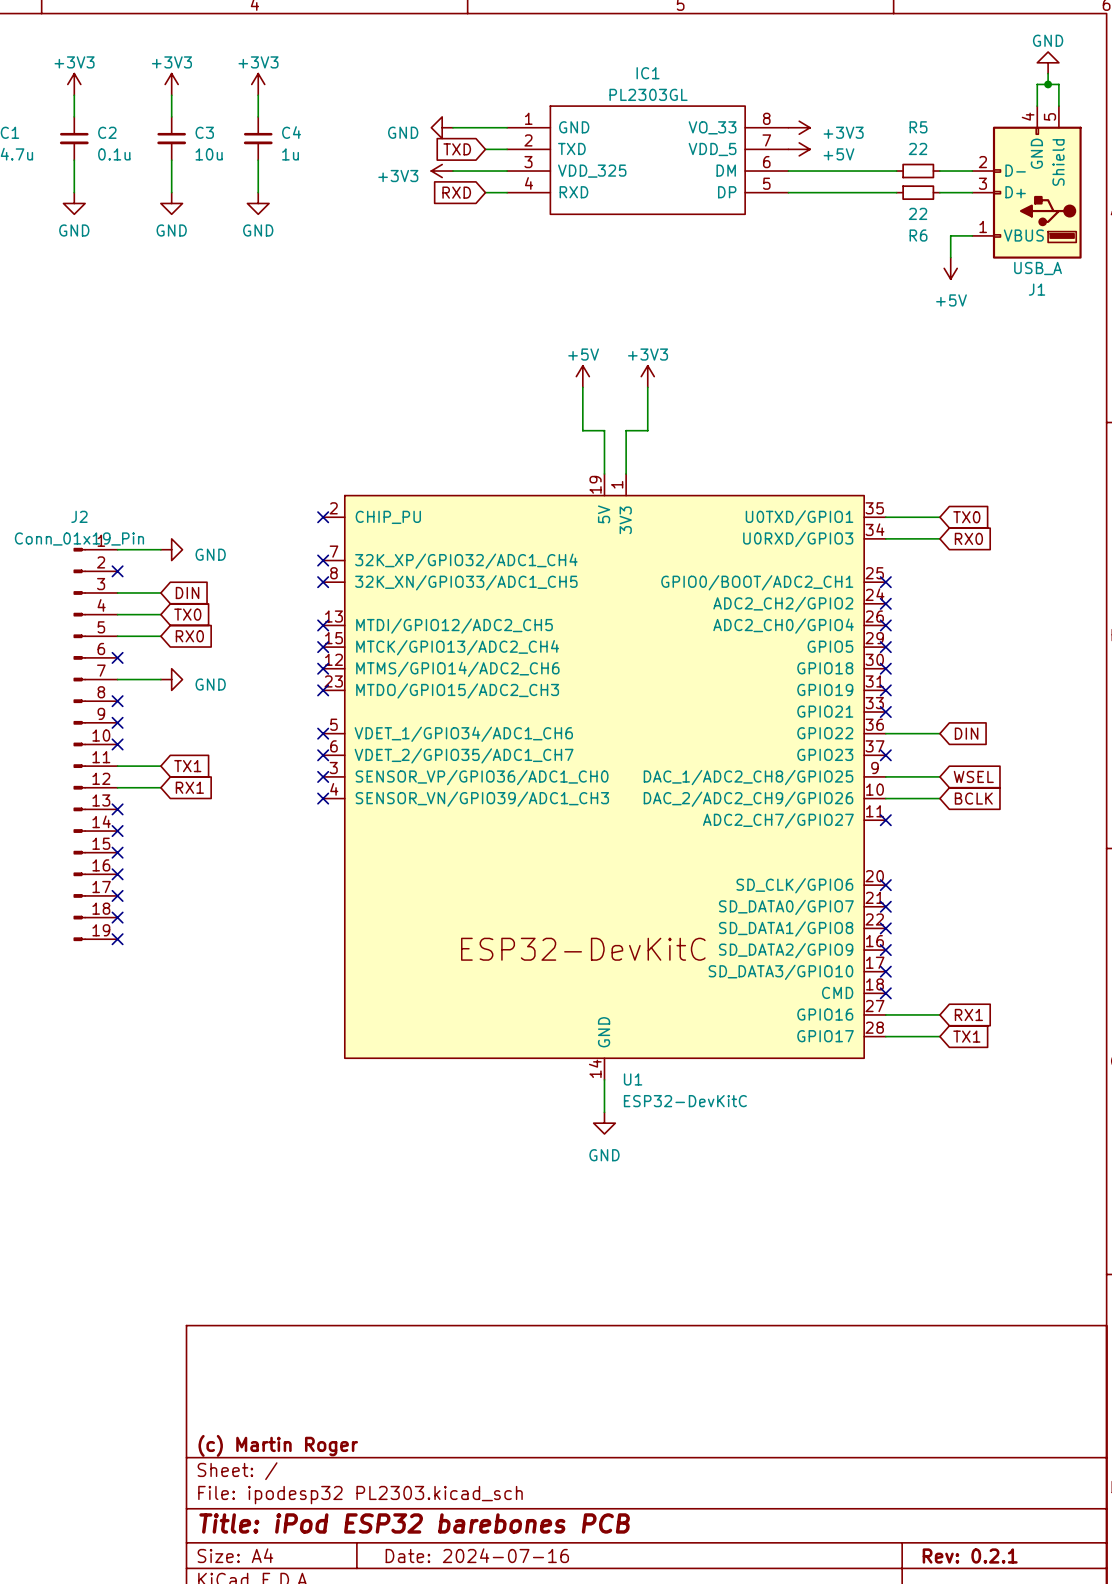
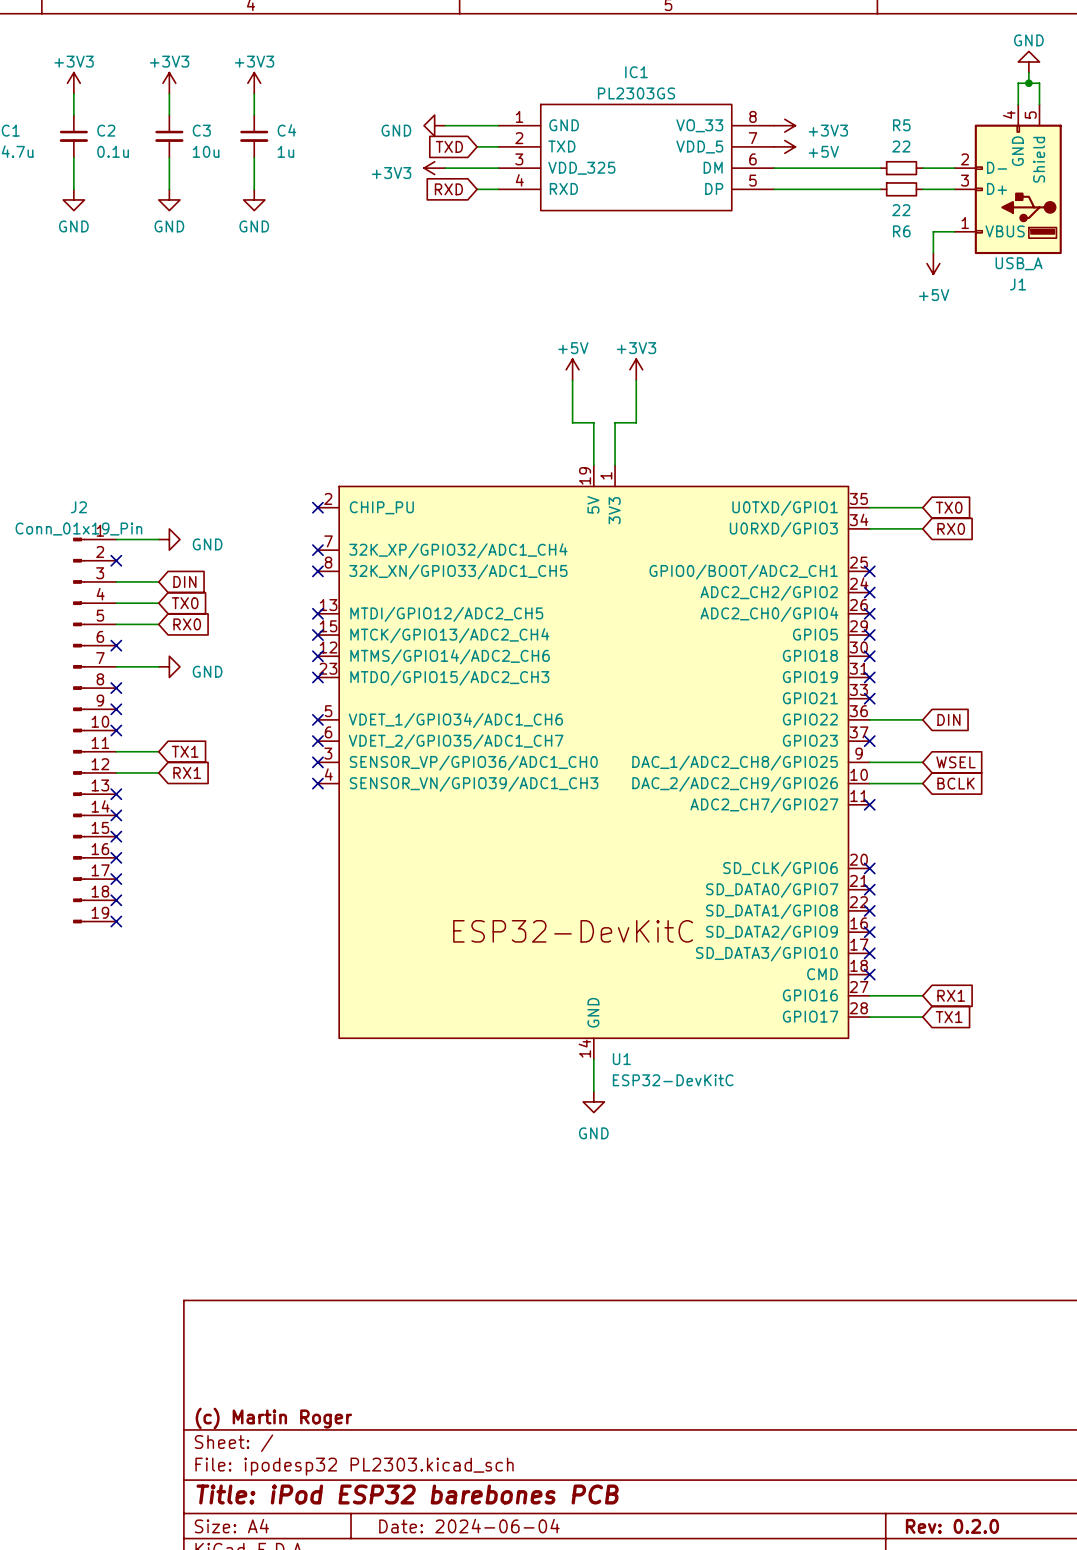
IC1 value: PL2303GL (648, 94) -> PL2303GS (636, 93)
title block: Date: 2024-07-16 (477, 1555) -> Date: 2024-06-04 (469, 1526)
title block: Rev: 0.2.1 (970, 1556) -> Rev: 0.2.0 (952, 1526)

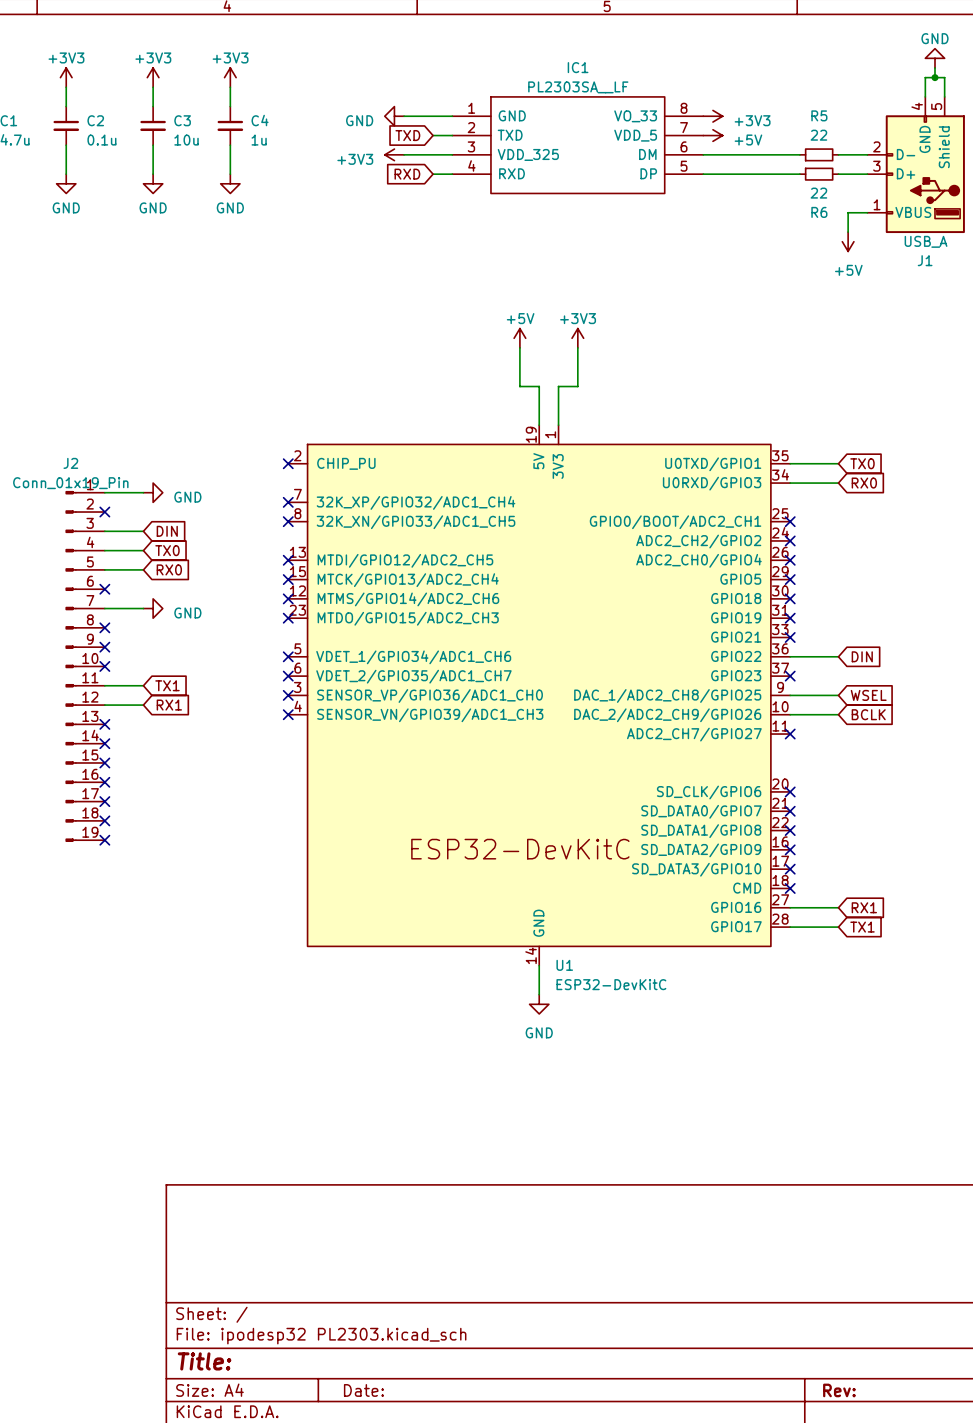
IC1 value: PL2303GS (636, 93) -> PL2303SA__LF (578, 87)
title block: (c) Martin Roger (273, 1418) -> none
title block: Title: iPod ESP32 barebones PCB (407, 1494) -> Title: (204, 1361)
title block: Date: 2024-06-04 (469, 1526) -> Date: (363, 1390)
title block: Rev: 0.2.0 (952, 1526) -> Rev: (839, 1390)

